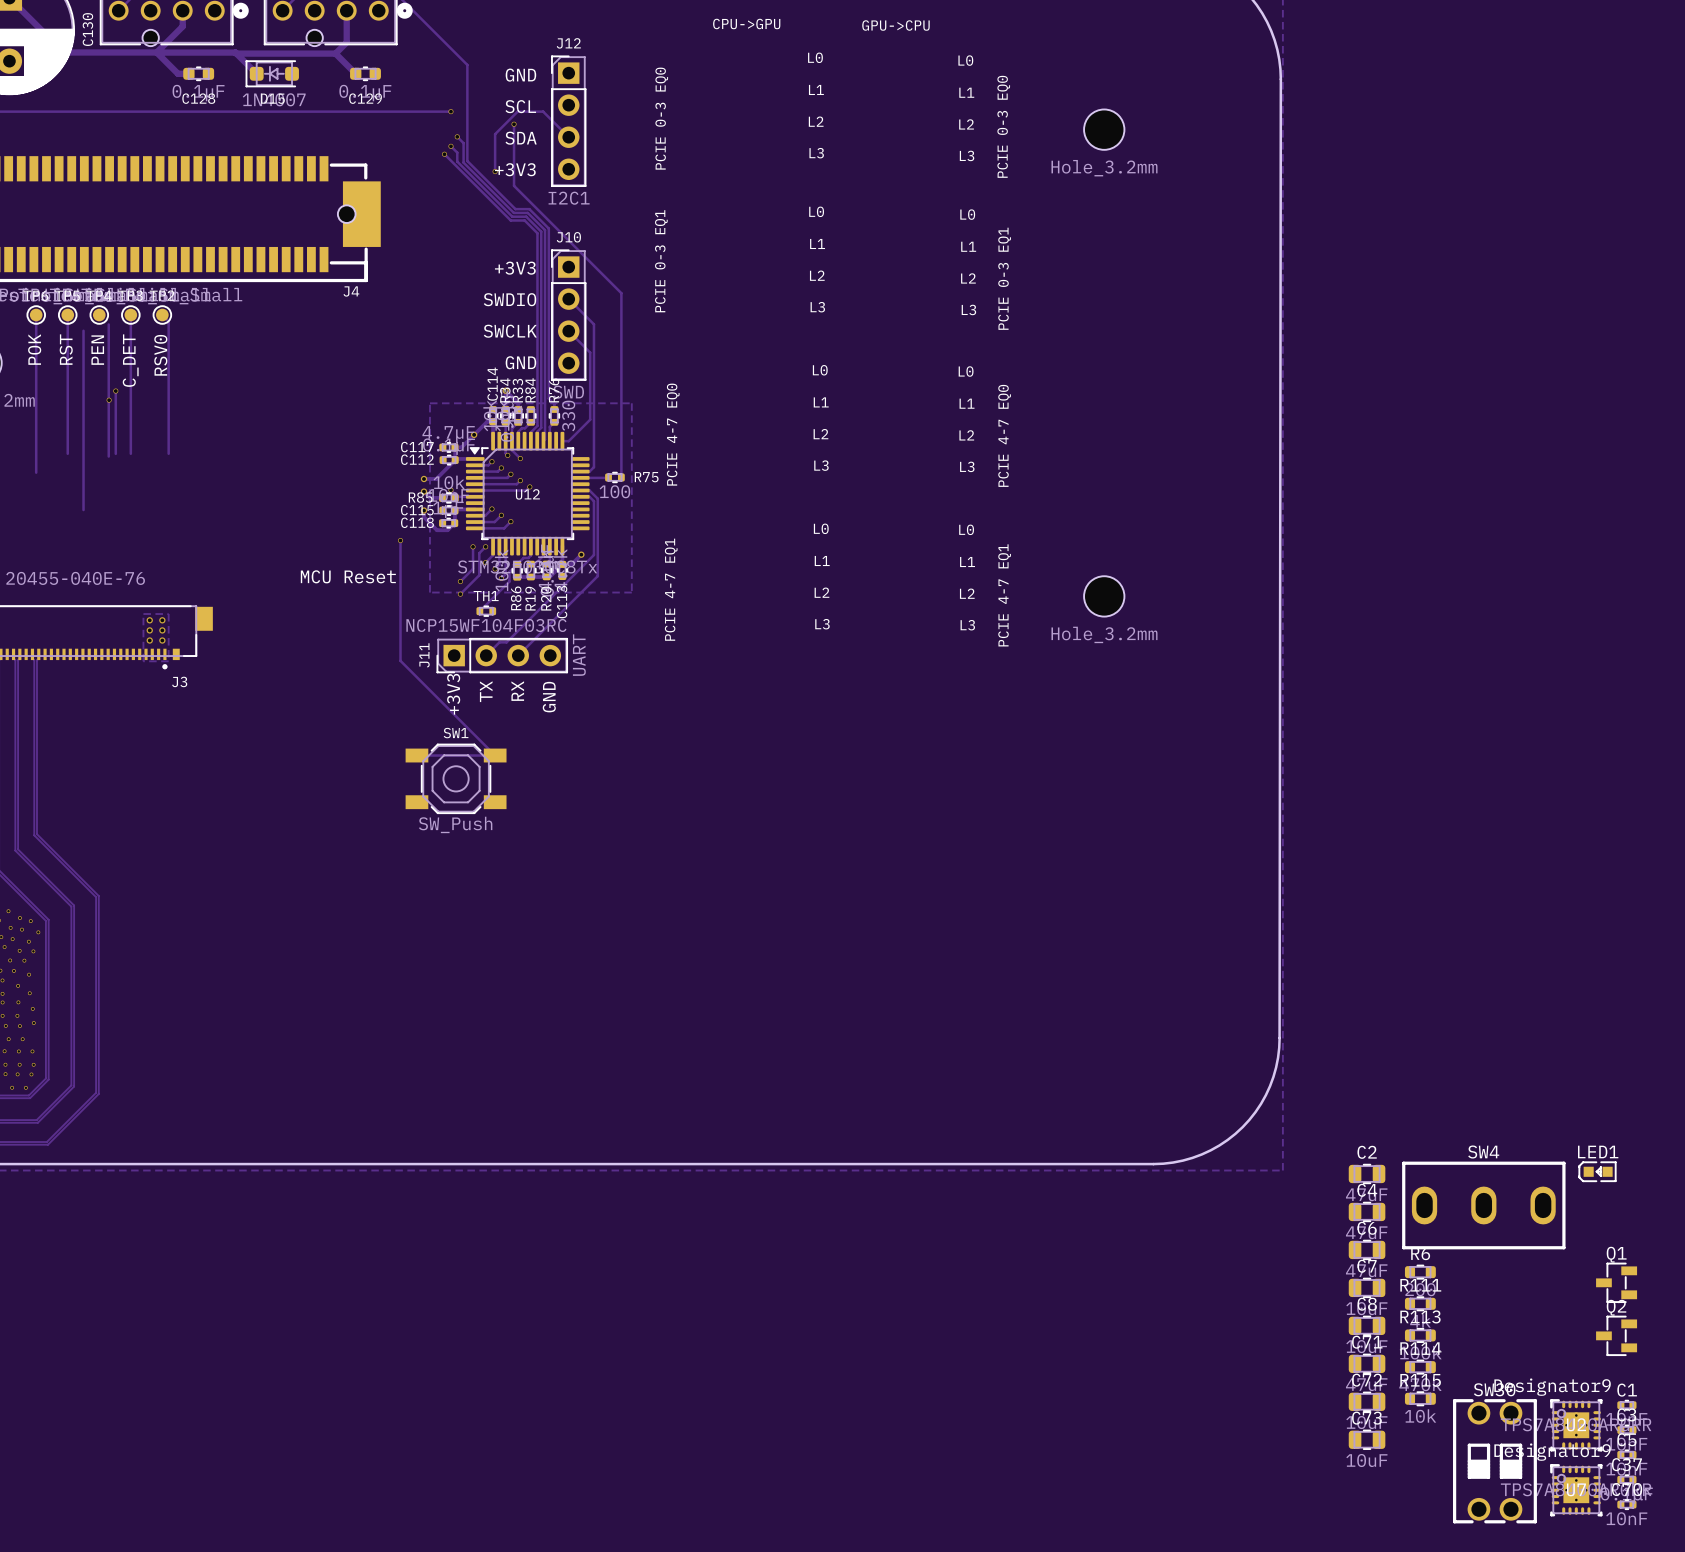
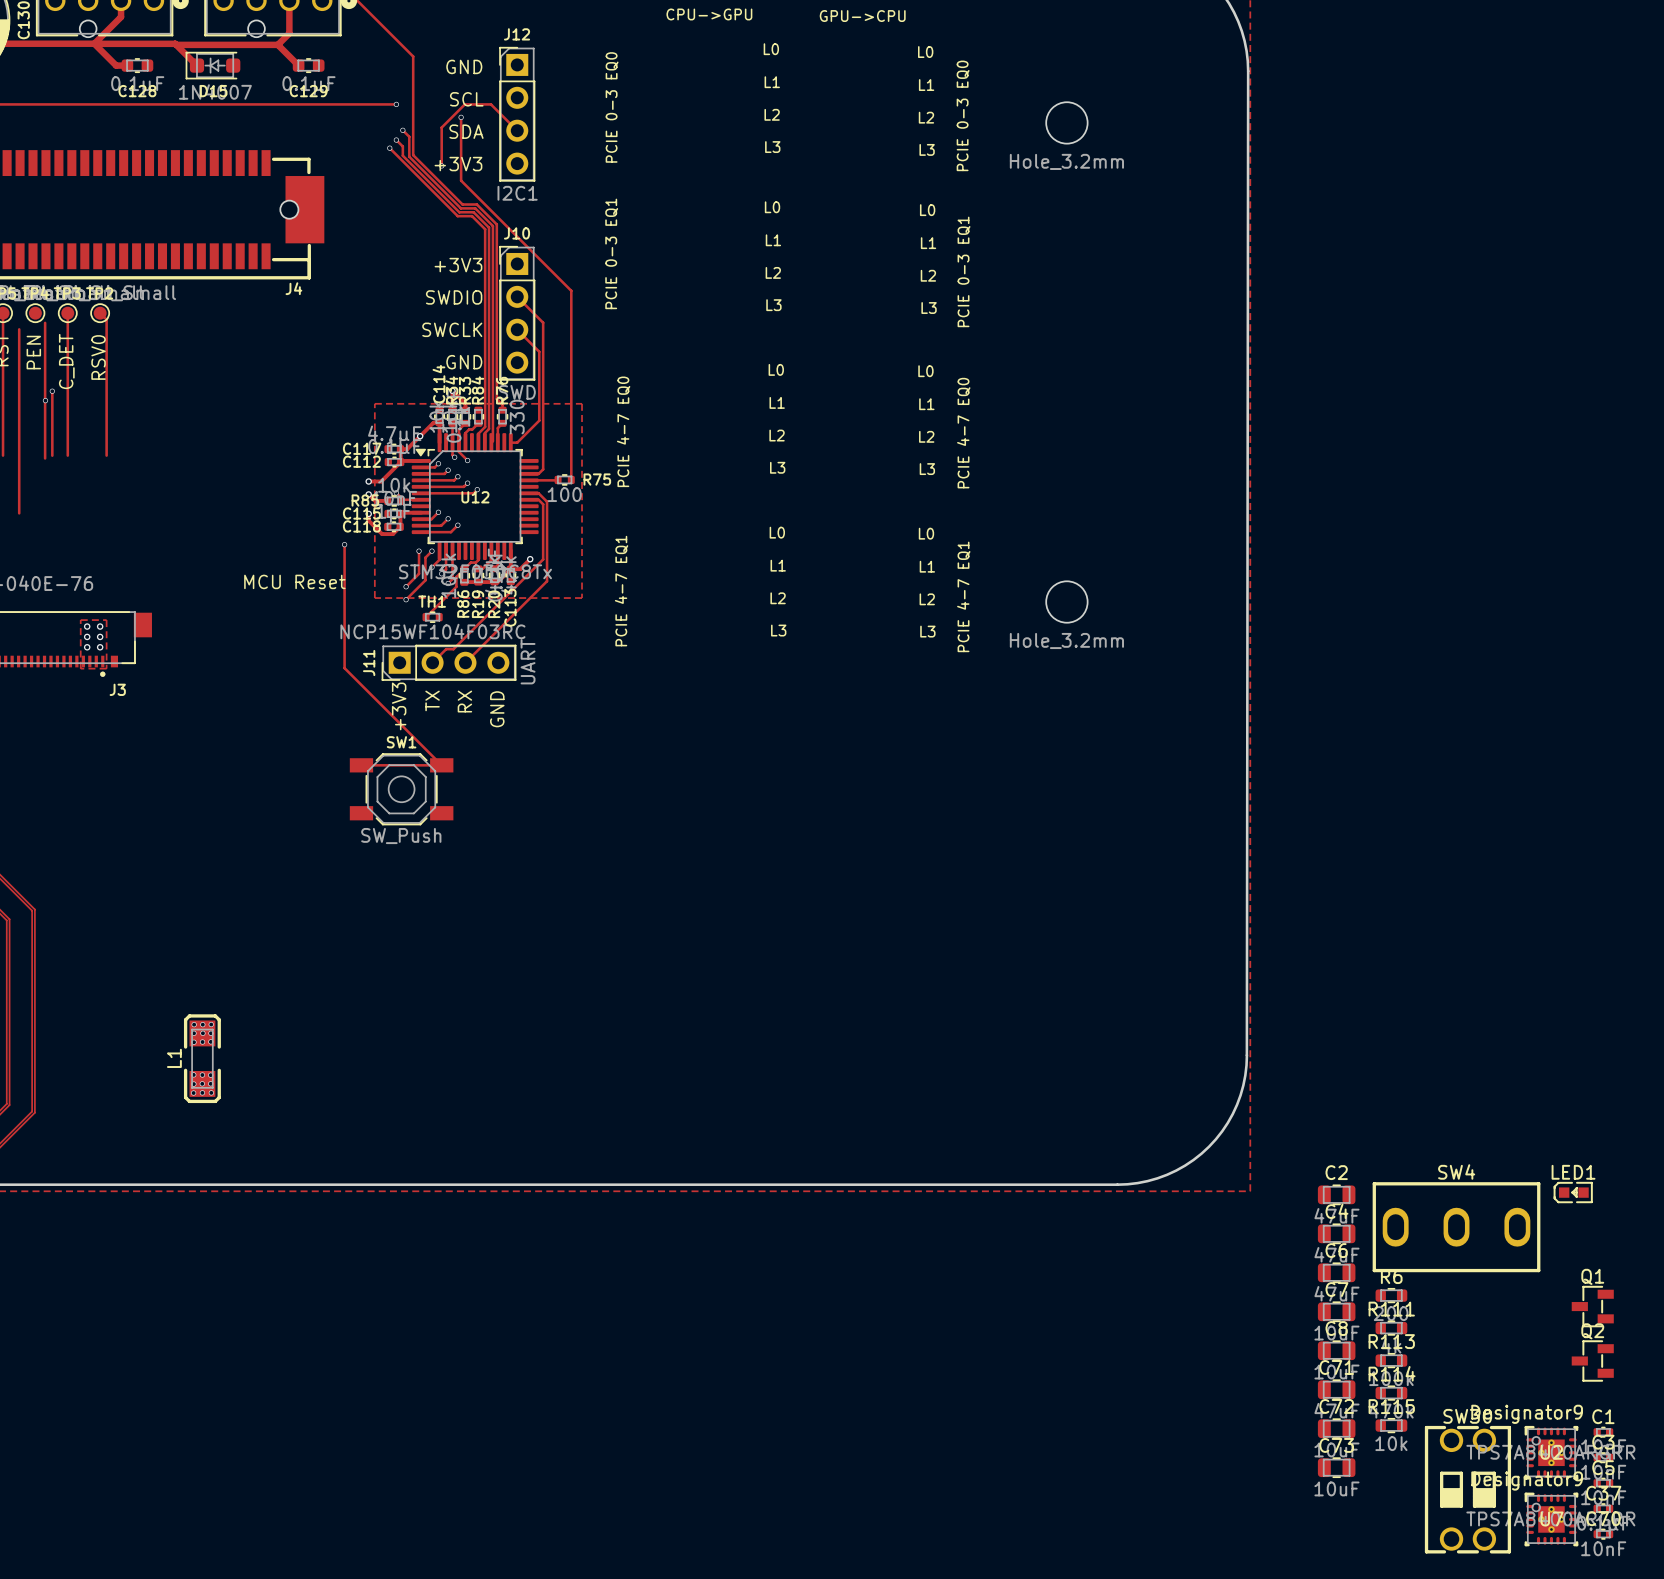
via: none -> (194, 1024)
via: none -> (202, 1024)
via: none -> (211, 1024)
via: none -> (194, 1033)
via: none -> (202, 1033)
via: none -> (210, 1033)
via: none -> (210, 1041)
via: none -> (194, 1042)
via: none -> (202, 1042)
L1: none -> (202, 1058)
via: none -> (193, 1074)
via: none -> (202, 1075)
via: none -> (210, 1075)
via: none -> (202, 1083)
via: none -> (210, 1083)
via: none -> (193, 1084)
via: none -> (193, 1093)
via: none -> (202, 1092)
via: none -> (211, 1092)

